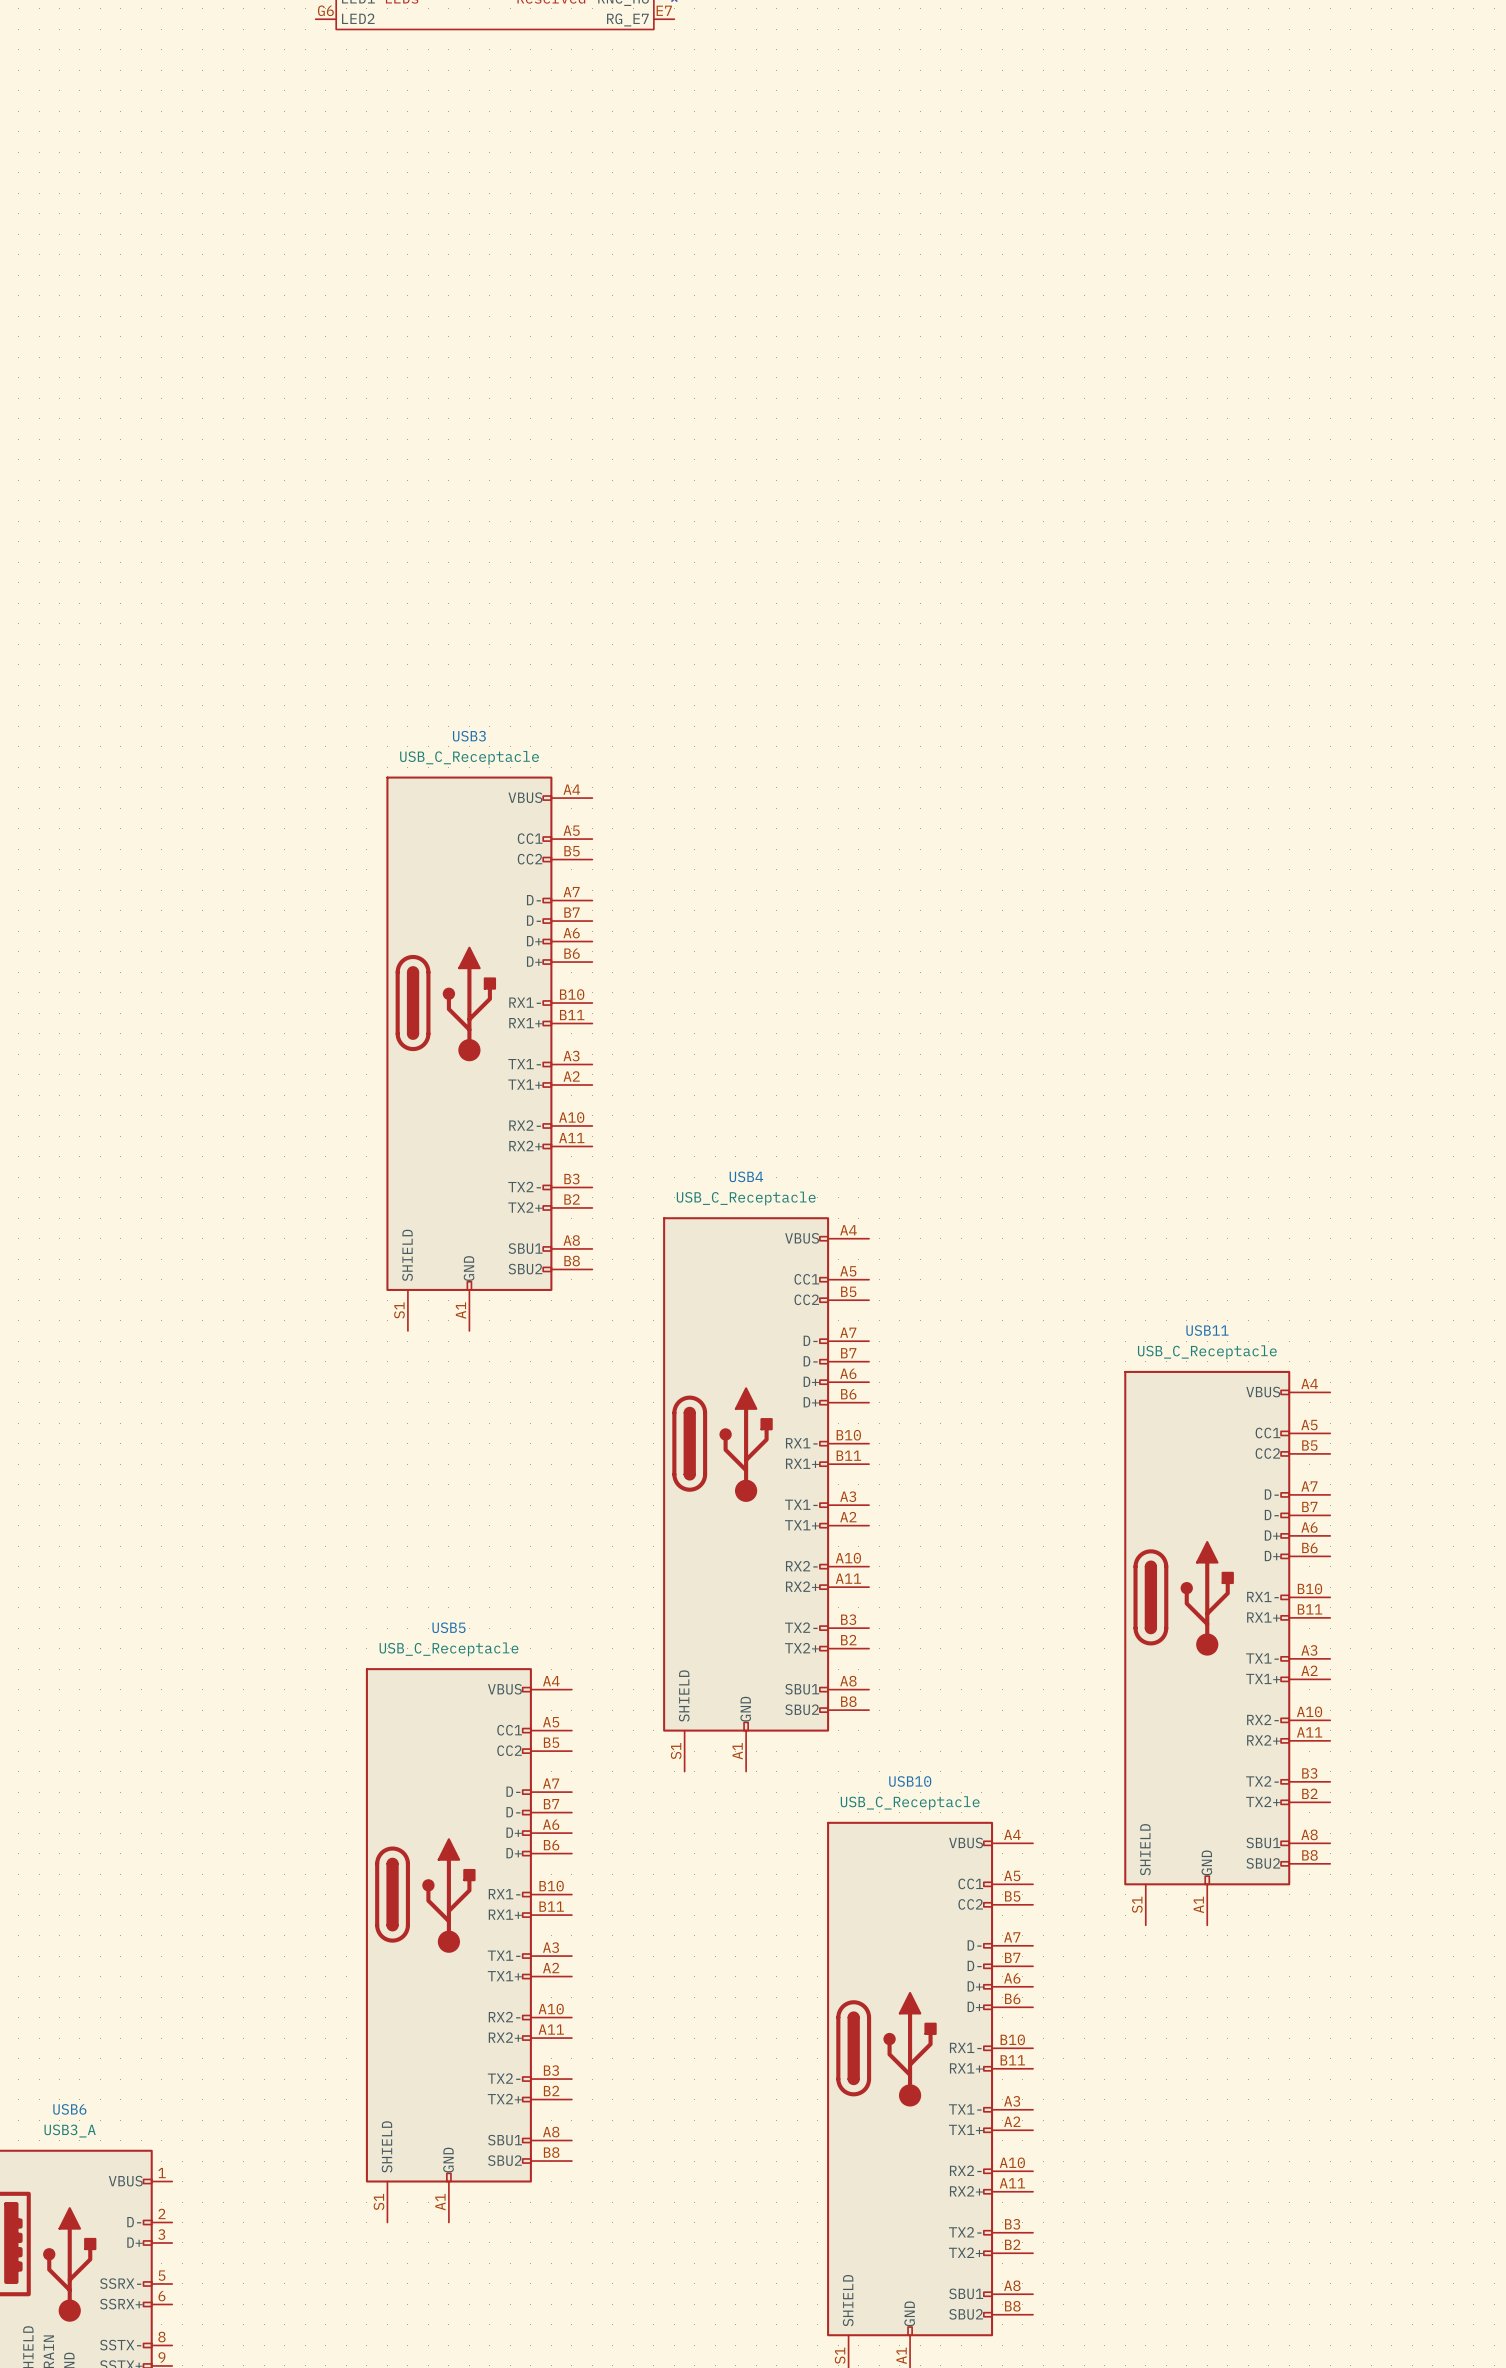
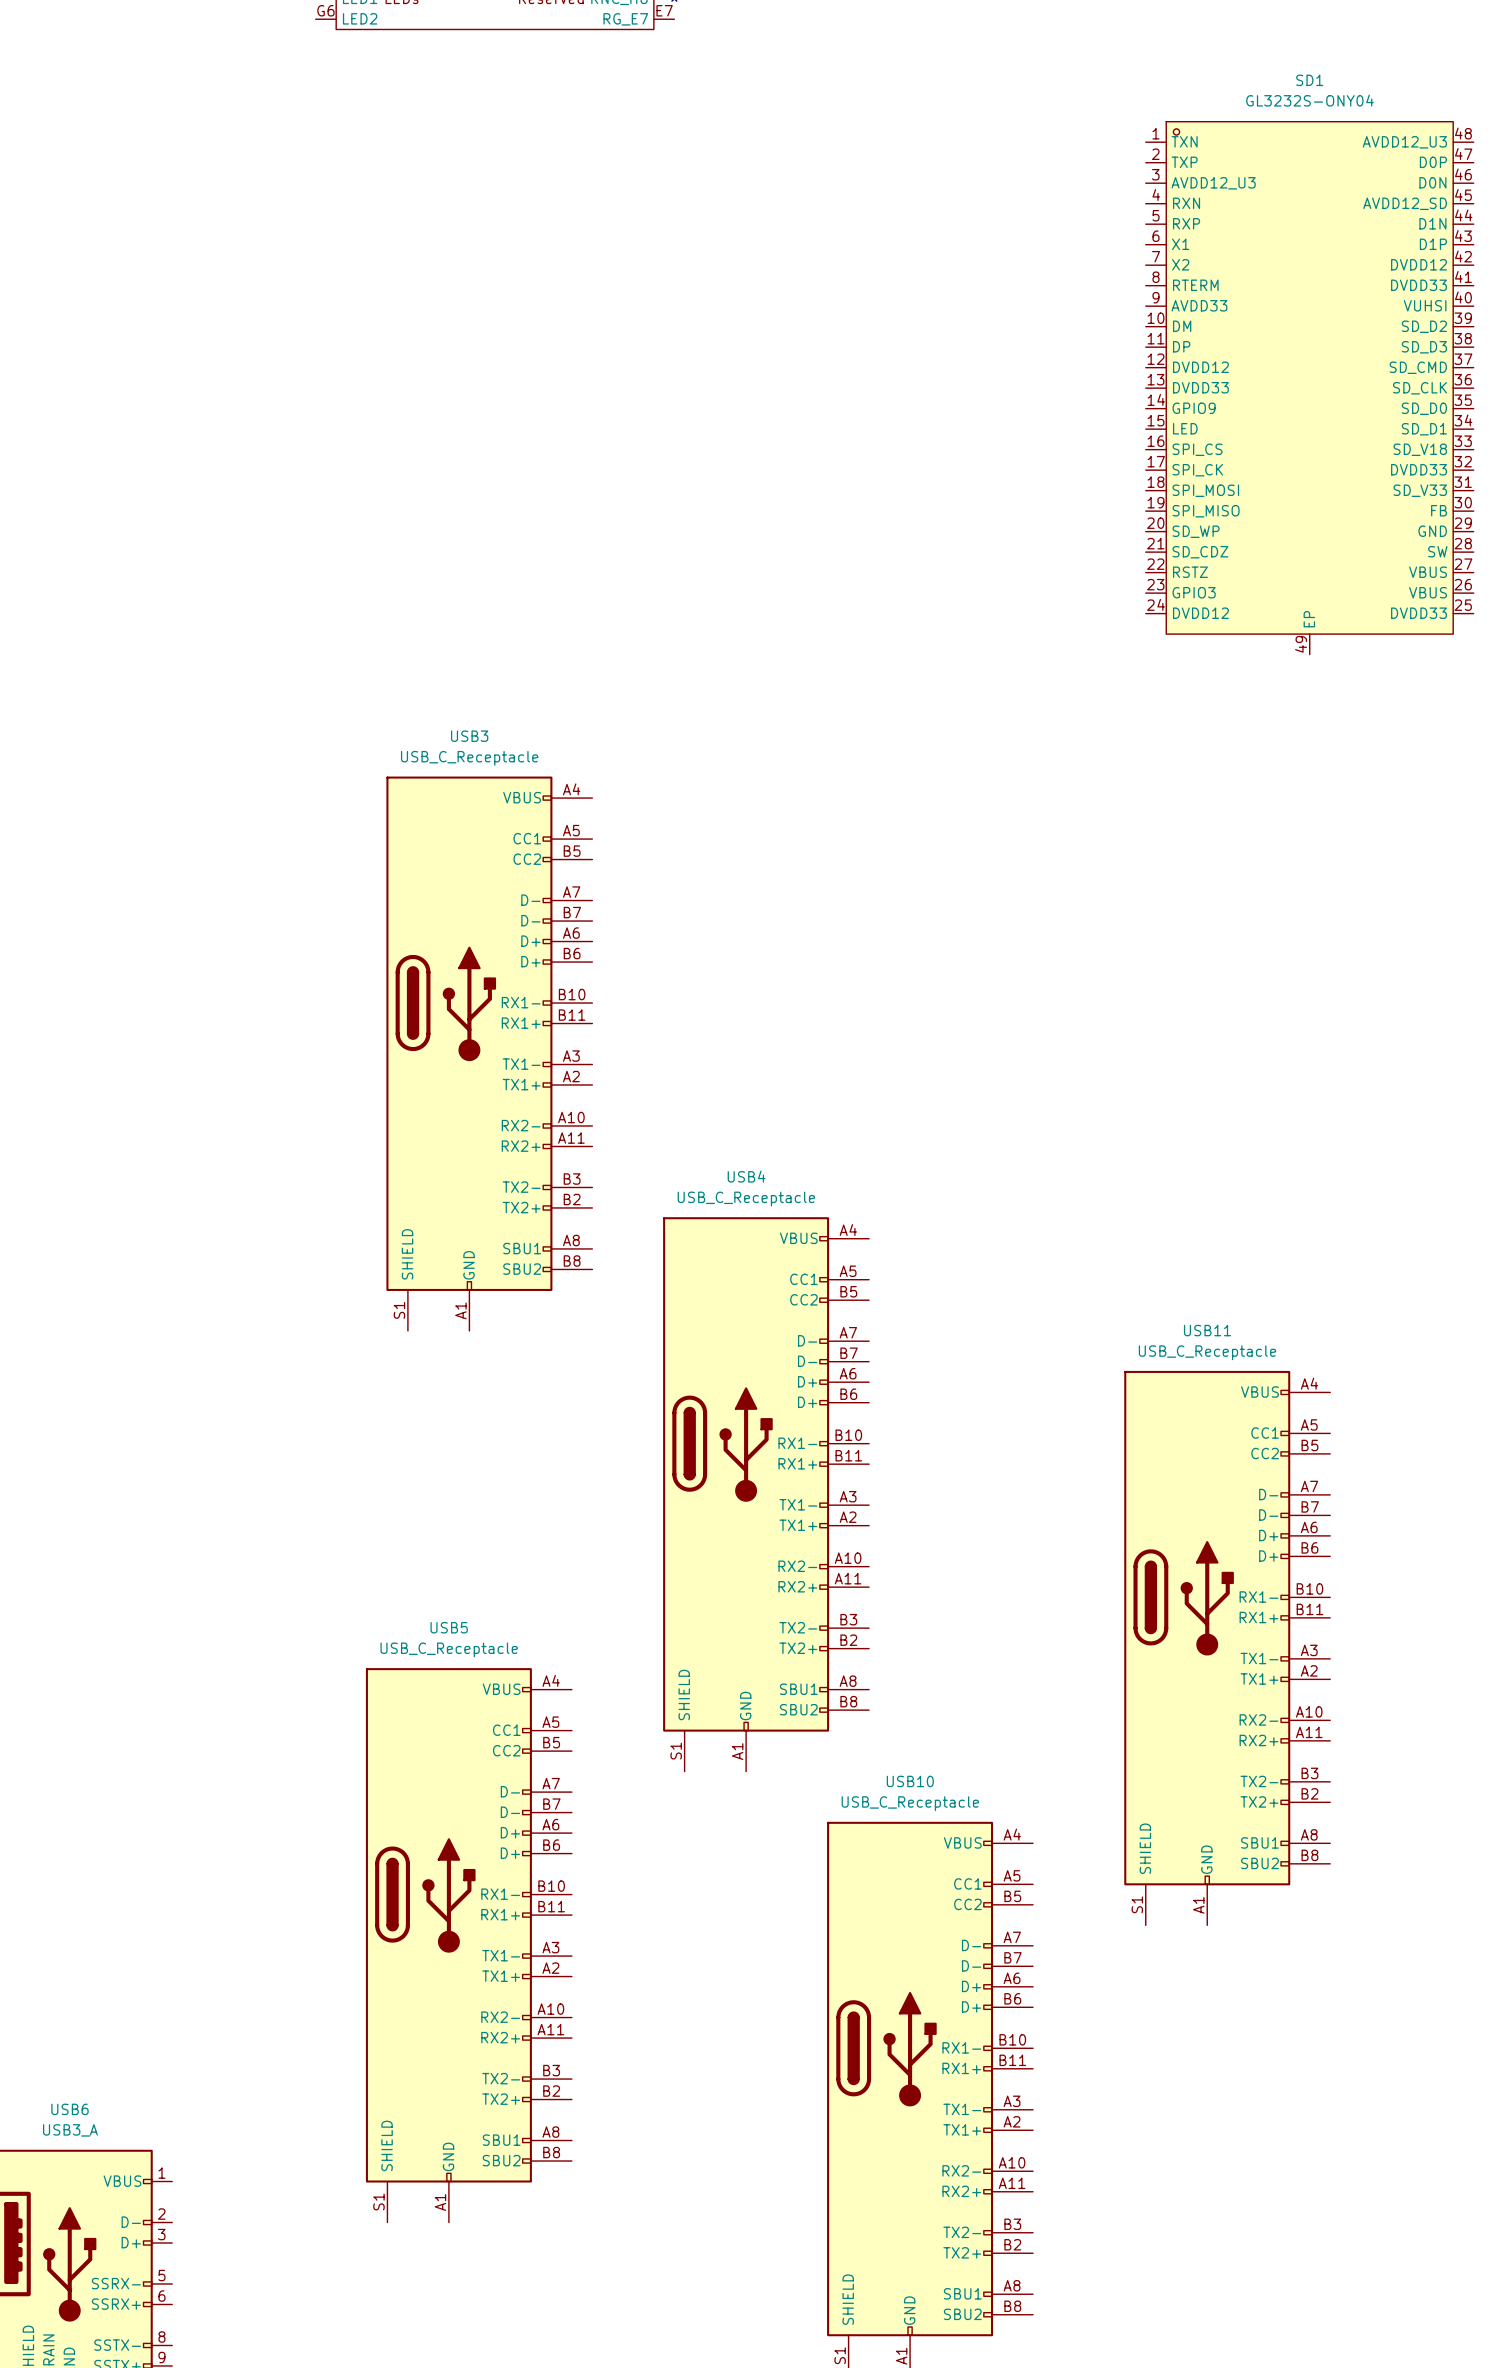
SD1: none -> GL3232S-ONY04 (1309, 388)

